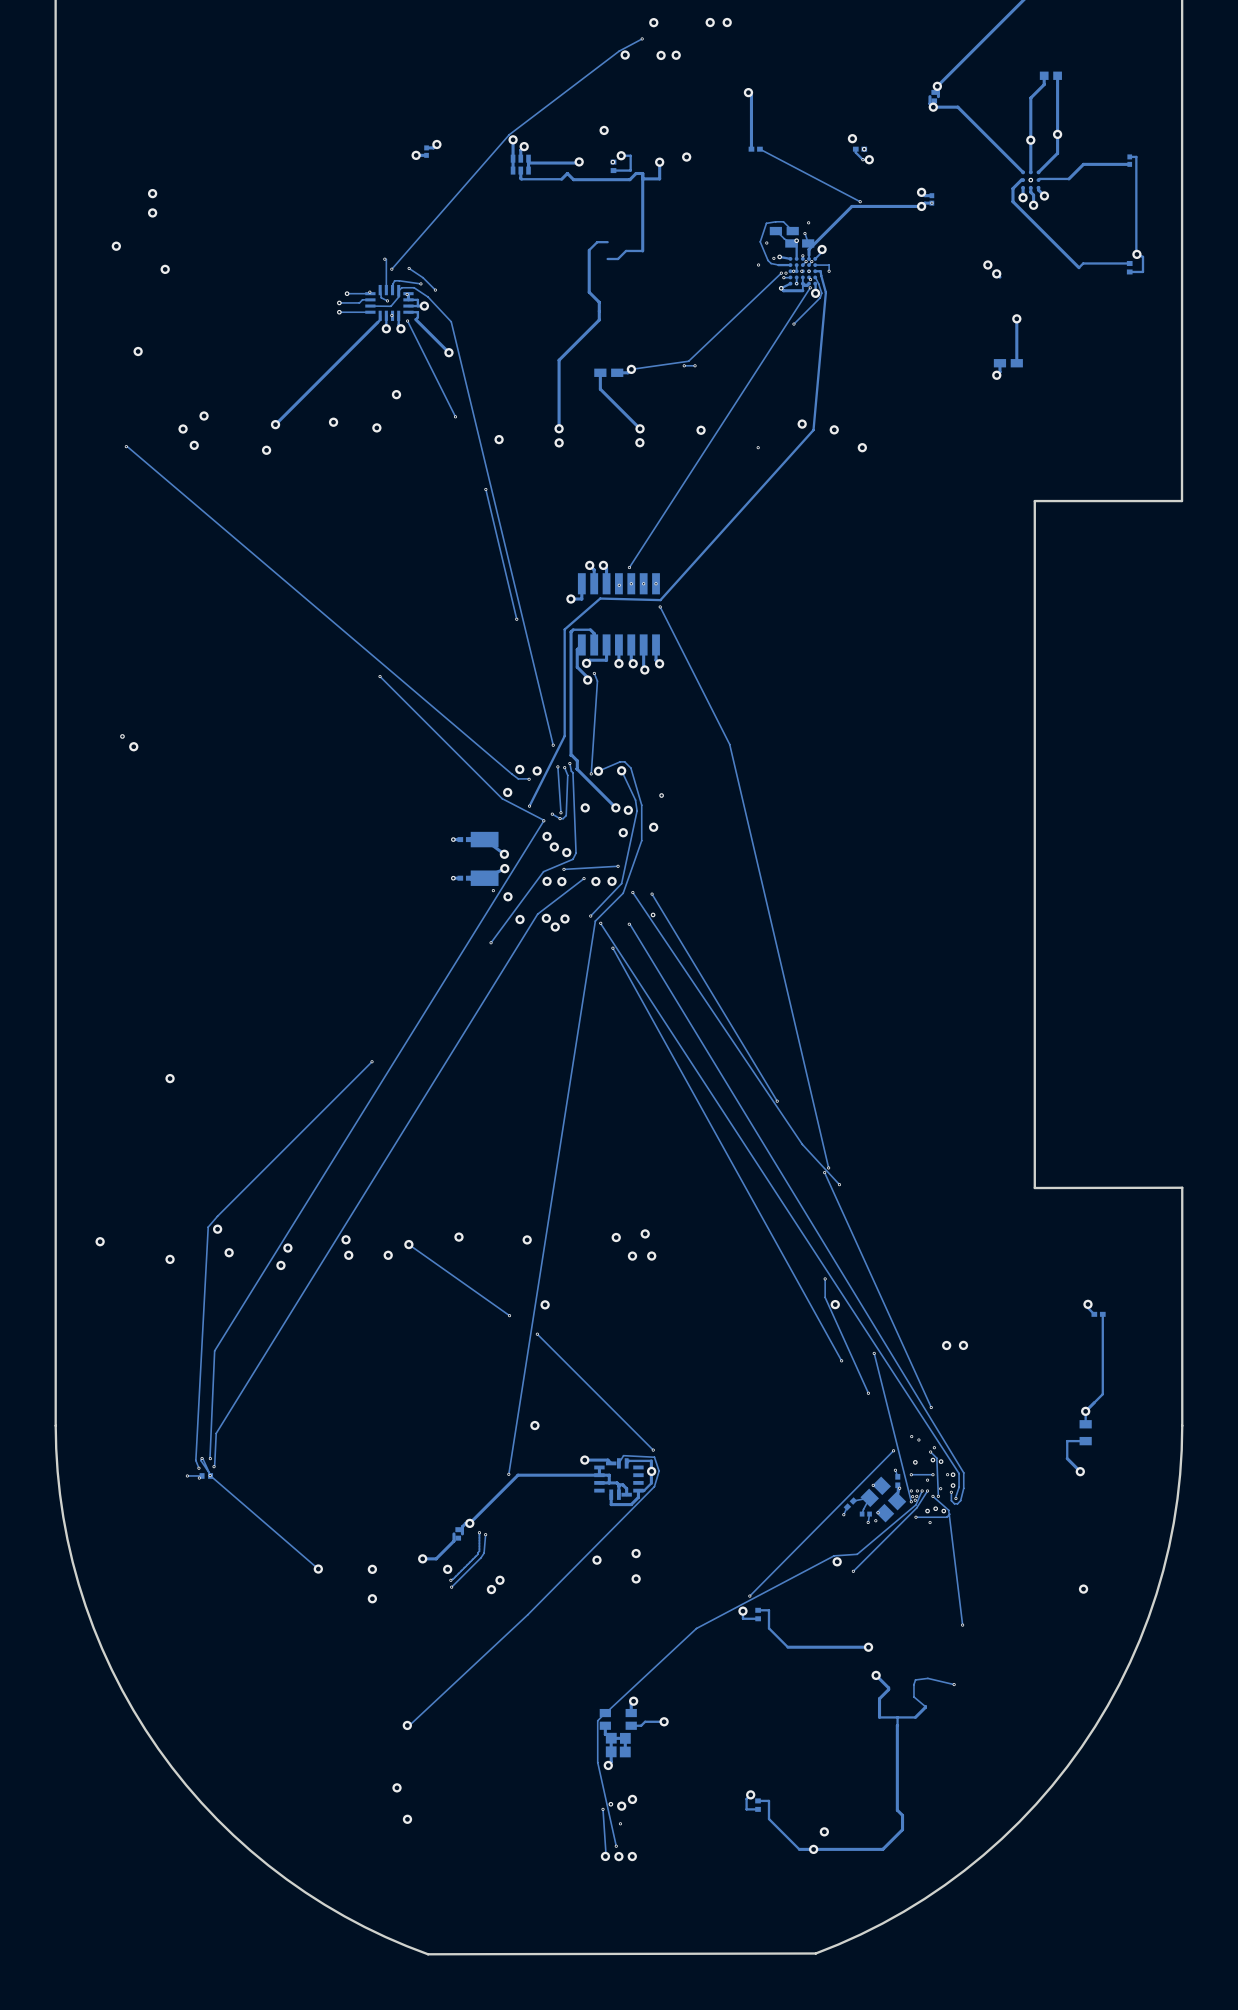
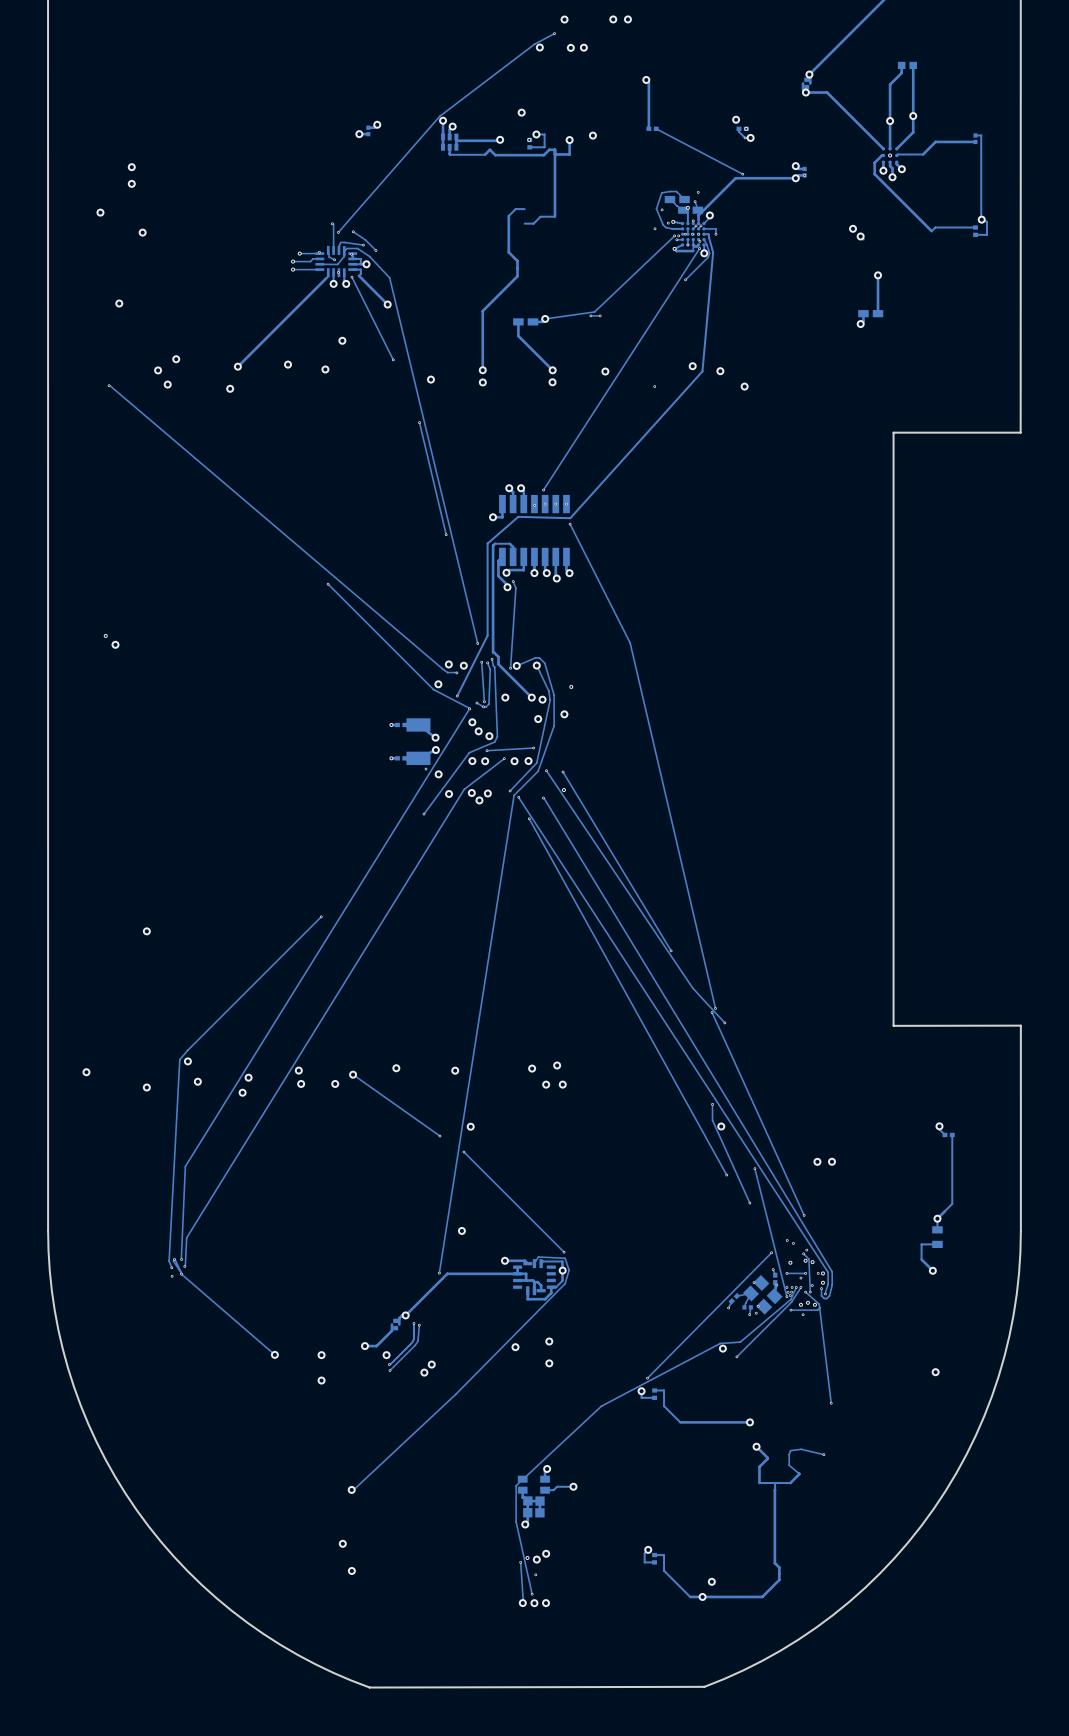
via: (187, 1475) -> none
track: (202, 1475) (188, 1475) -> none
part: (206, 1475) -> none

